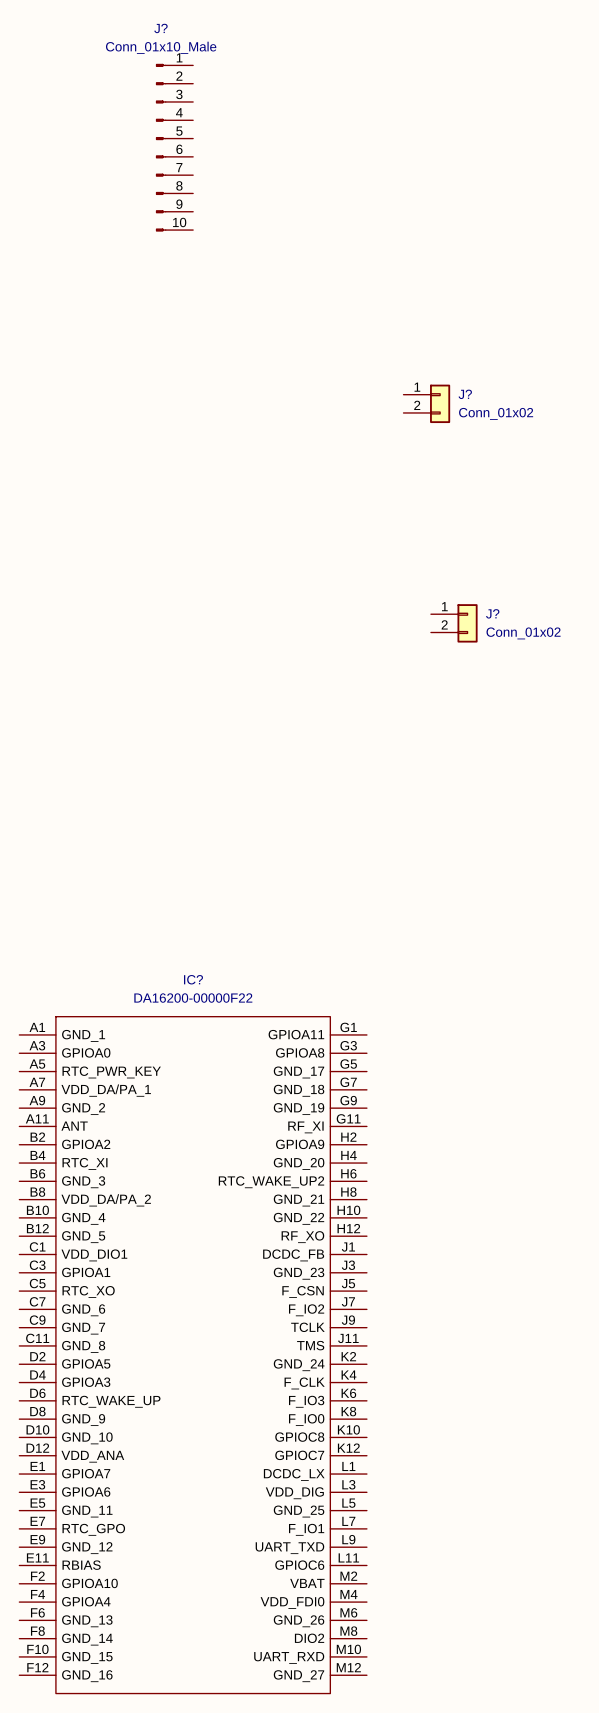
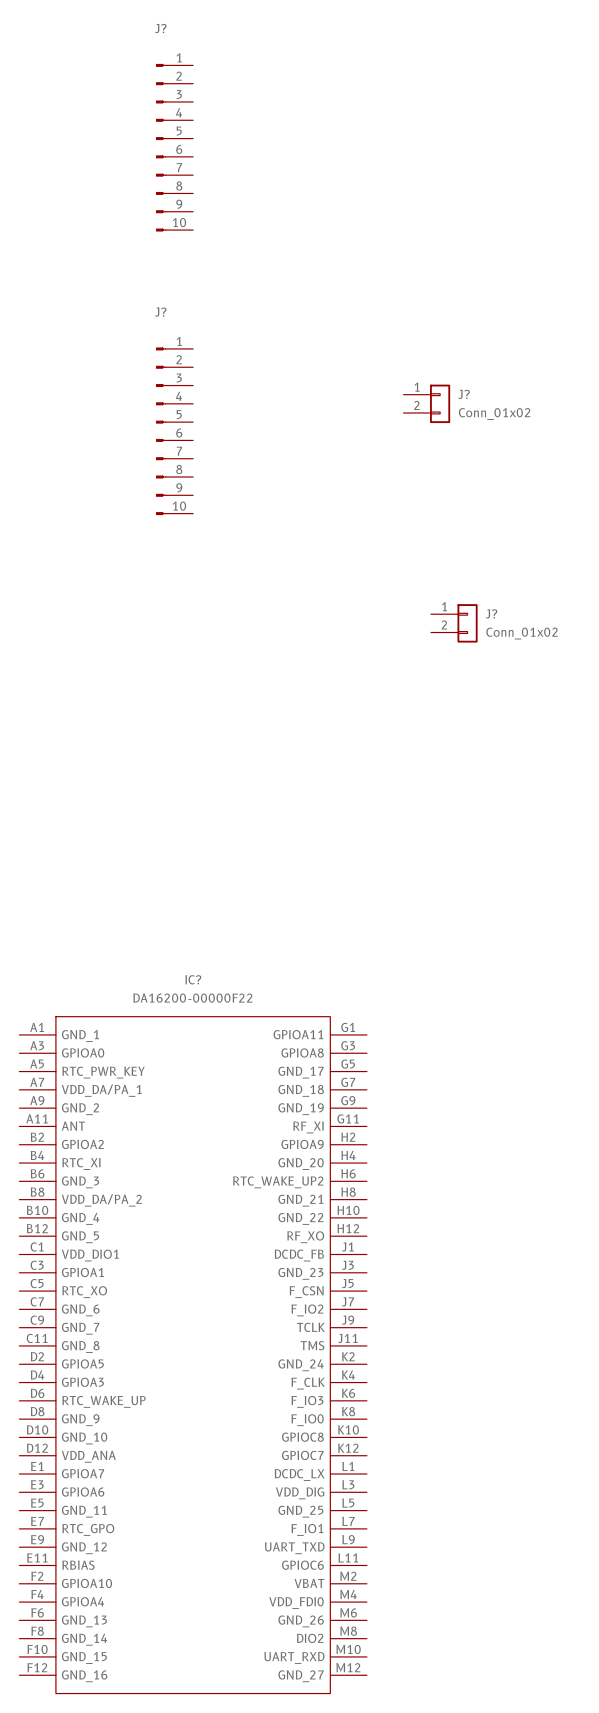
J? value: Conn_01x10_Male (161, 47) -> none
J?: none -> (174, 431)

